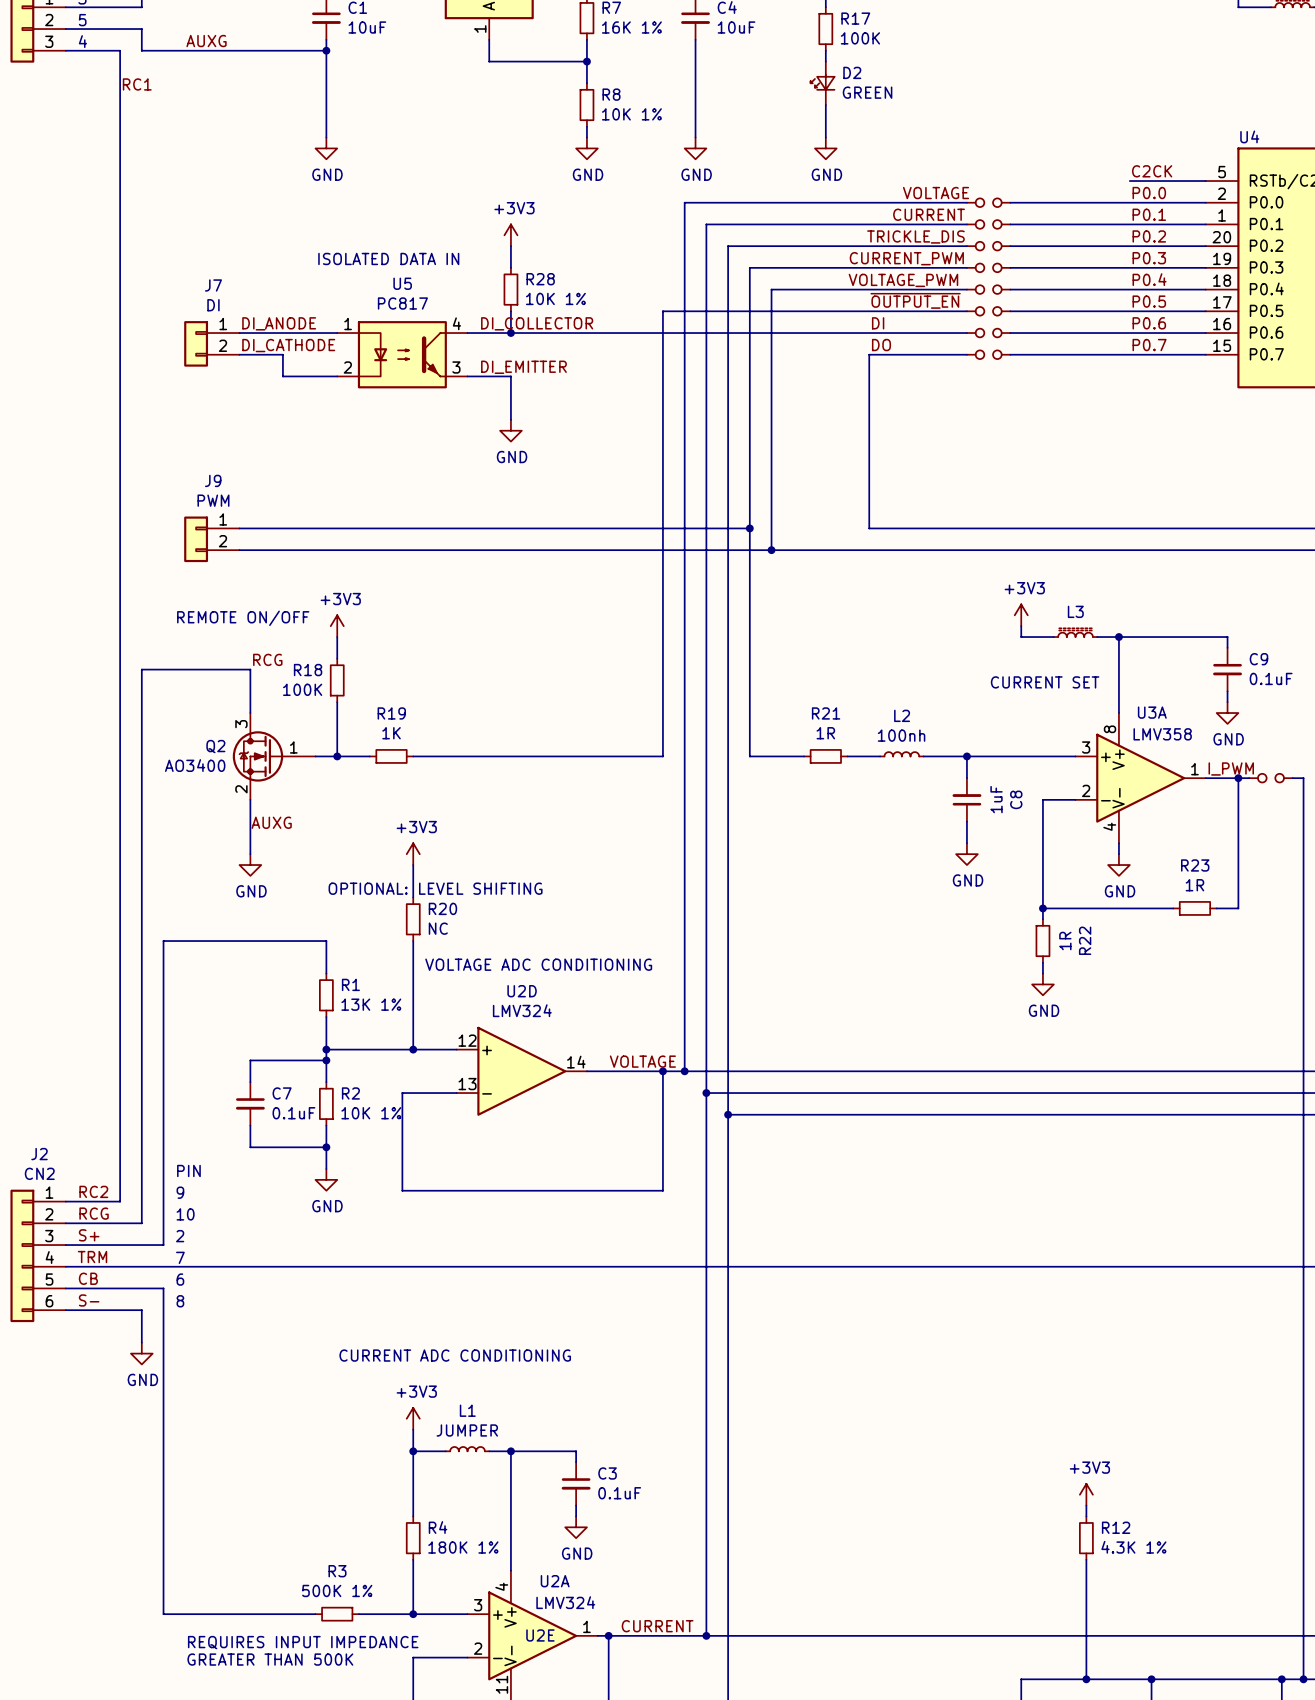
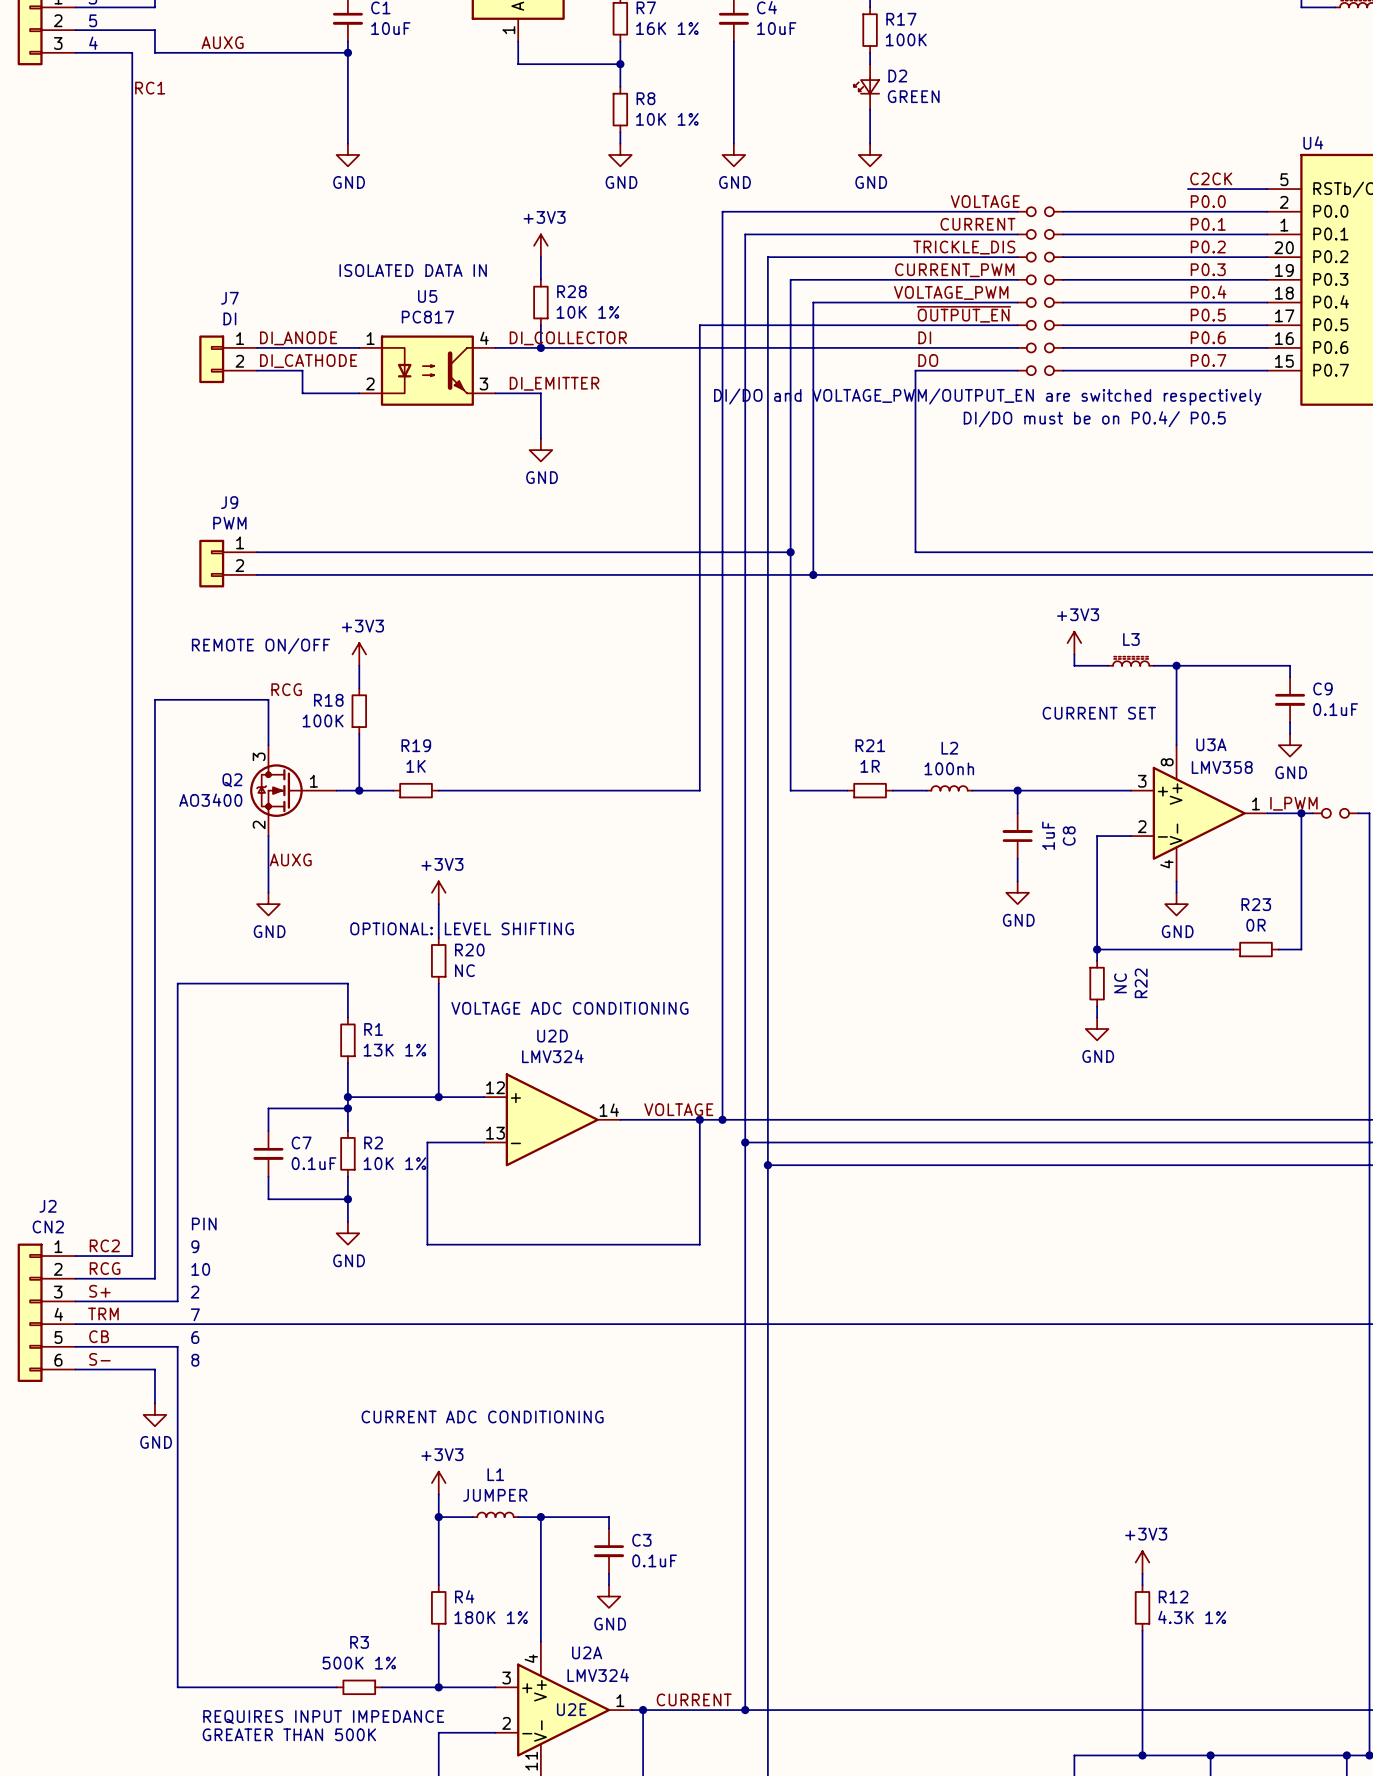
text: none -> DI/DO and VOLTAGE_PWM/OUTPUT_EN are switched respectively (987, 397)
text: none -> DI/DO must be on P0.4/ P0.5 (1094, 419)
R23 value: 1R (1194, 885) -> 0R (1256, 925)
R22 value: 1R (1065, 941) -> NC (1120, 983)

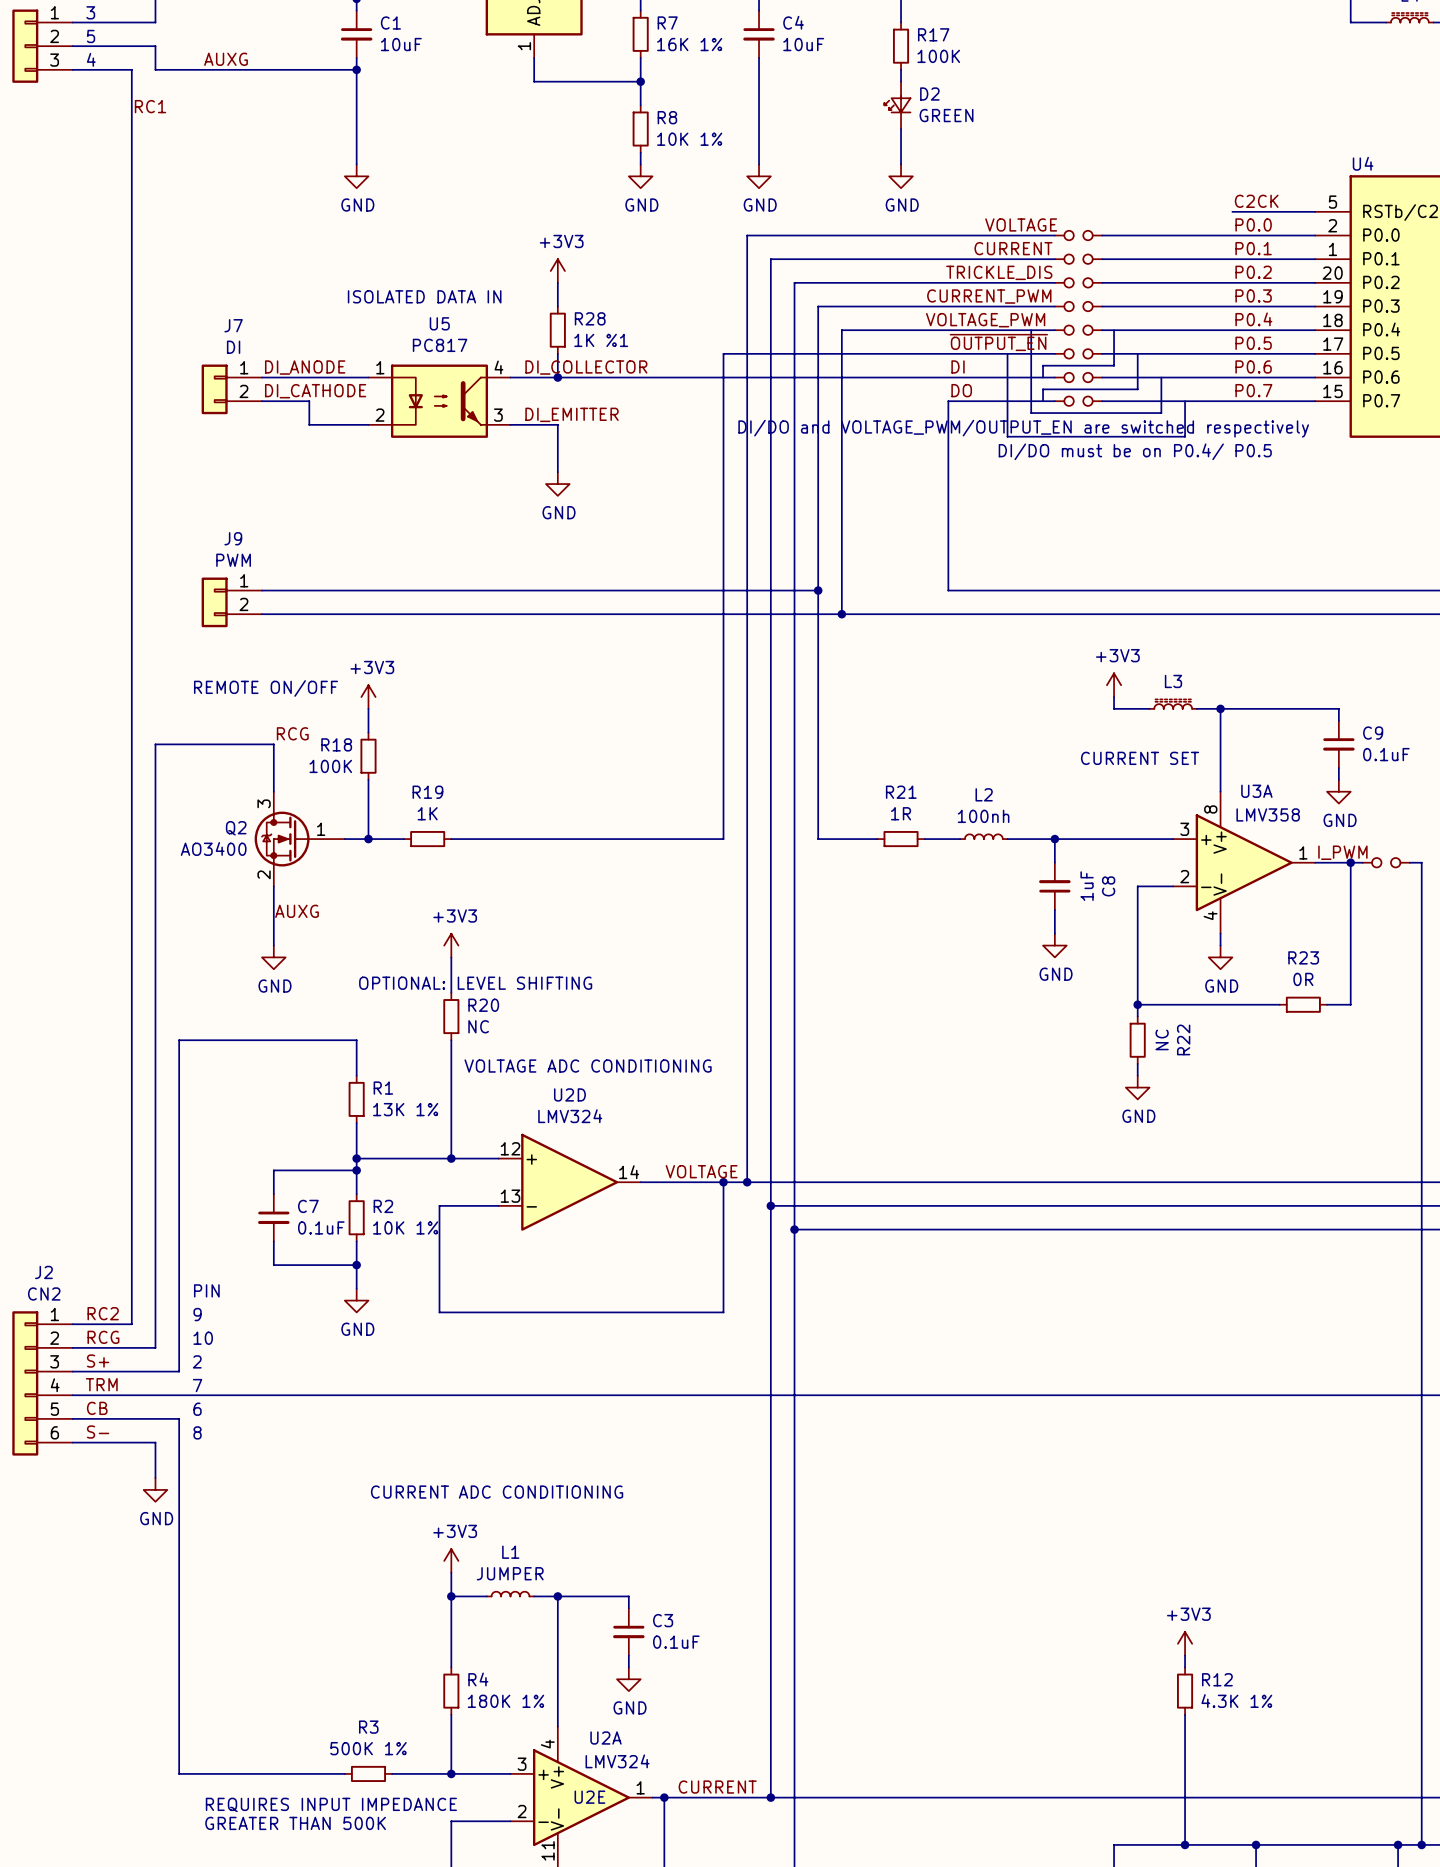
bus: none -> (1031, 330) (1031, 413) (1161, 413) (1161, 377)
bus: none -> (1114, 330) (1114, 365) (1043, 365) (1043, 377)
R28 value: 10K 1% (587, 312) -> 1K %1 (601, 340)
bus: none -> (1007, 353) (1007, 436) (1185, 436) (1185, 401)
bus: none -> (1137, 353) (1137, 389) (1043, 389) (1043, 401)

